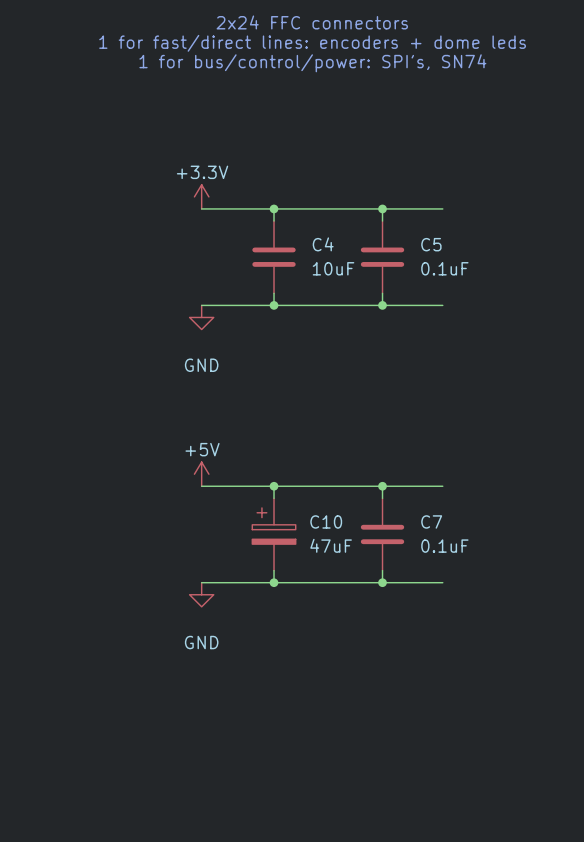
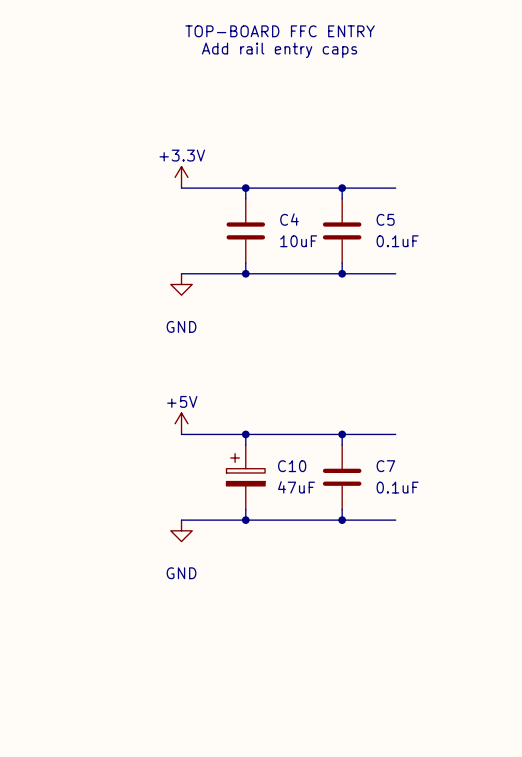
text: 2x24 FFC connectors (312, 22) -> none
text: none -> TOP-BOARD FFC ENTRY (280, 31)
text: 1 for fast/direct lines: encoders + dome leds (312, 43) -> none
text: none -> Add rail entry caps (279, 50)
text: 1 for bus/control/power: SPI's, SN74 (312, 63) -> none

